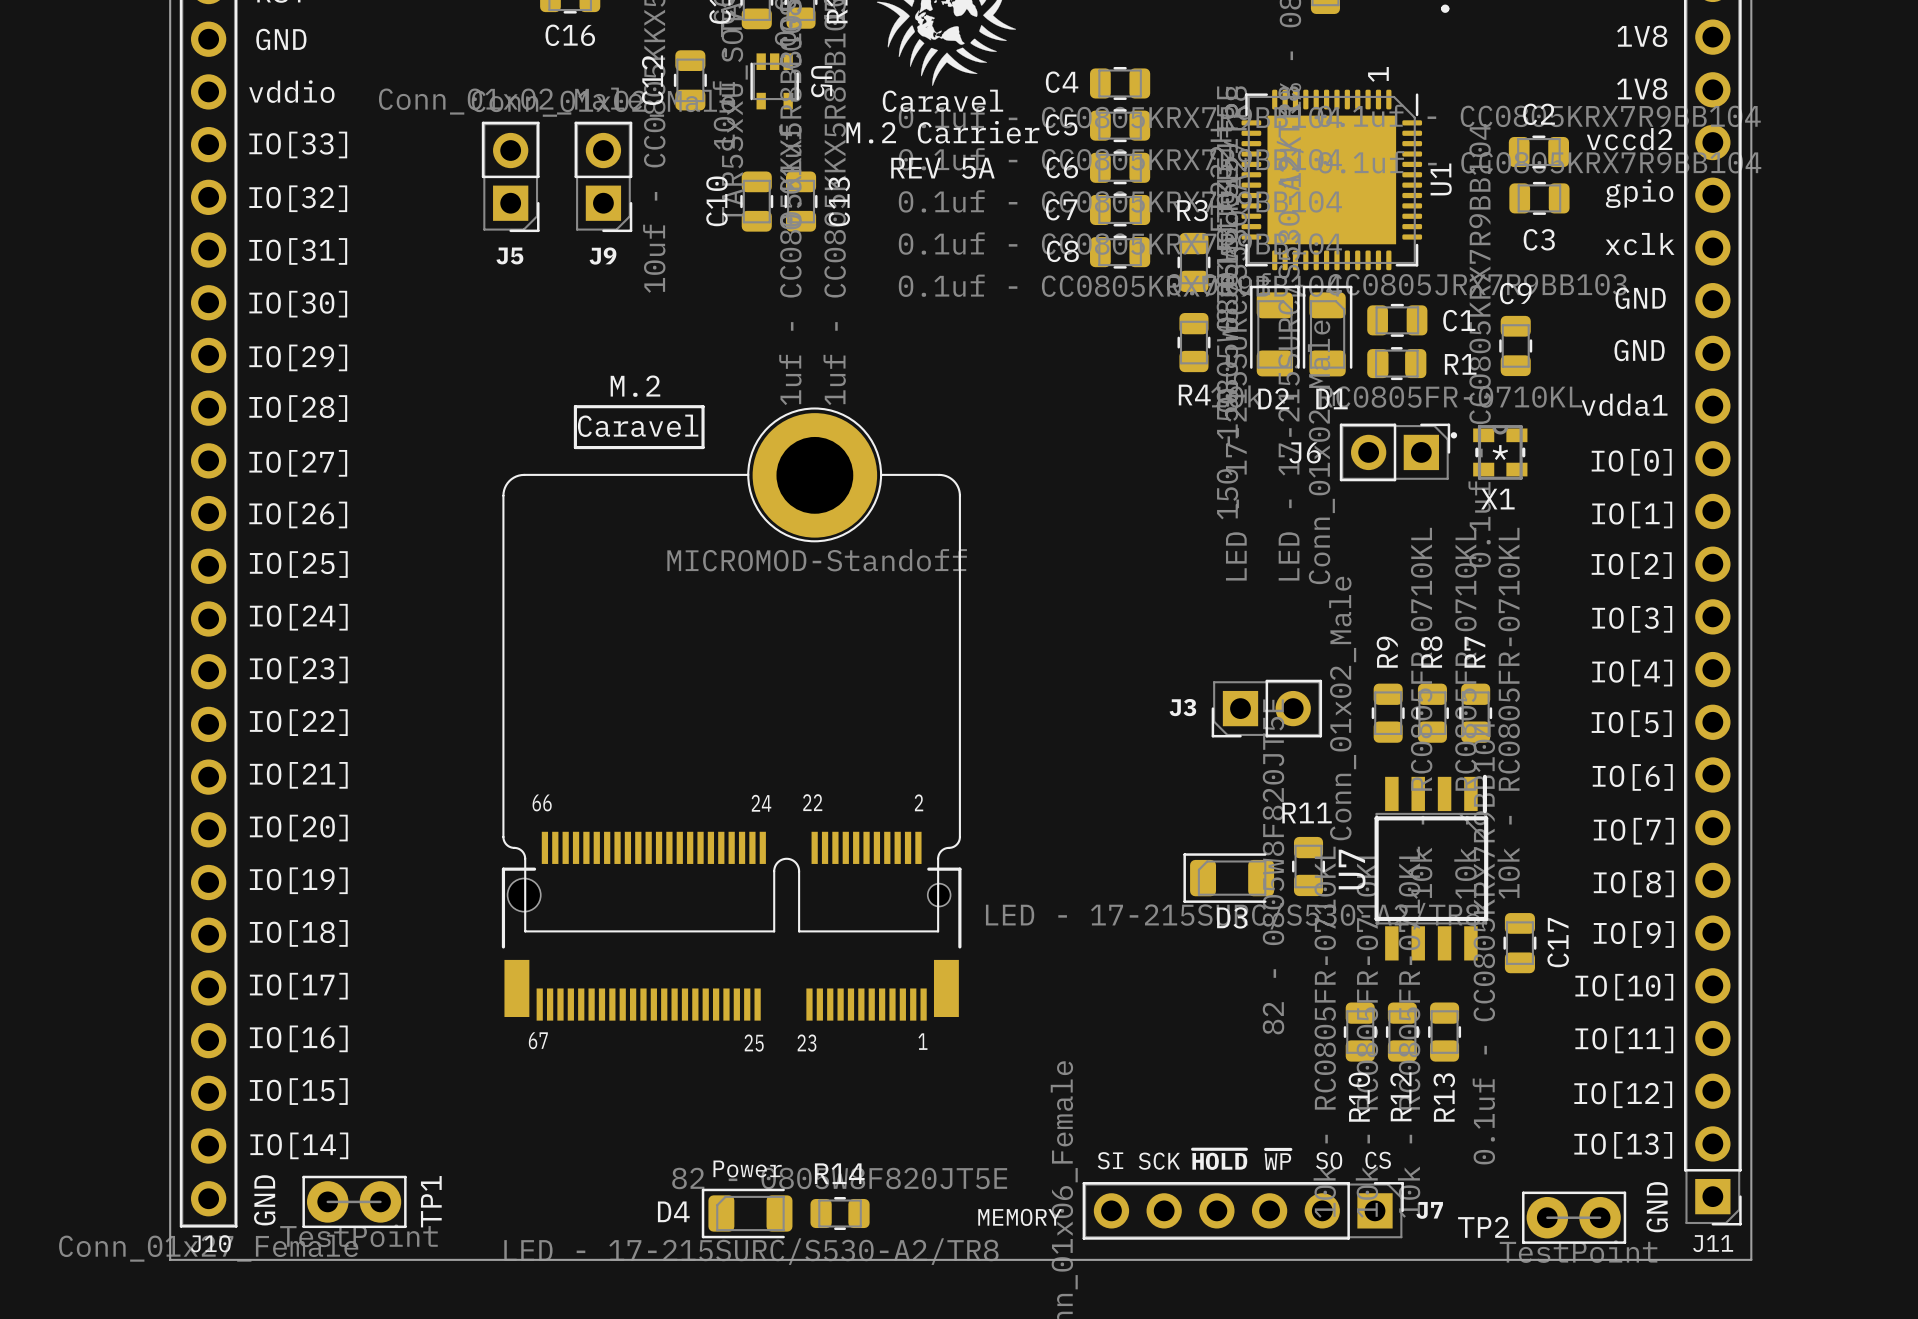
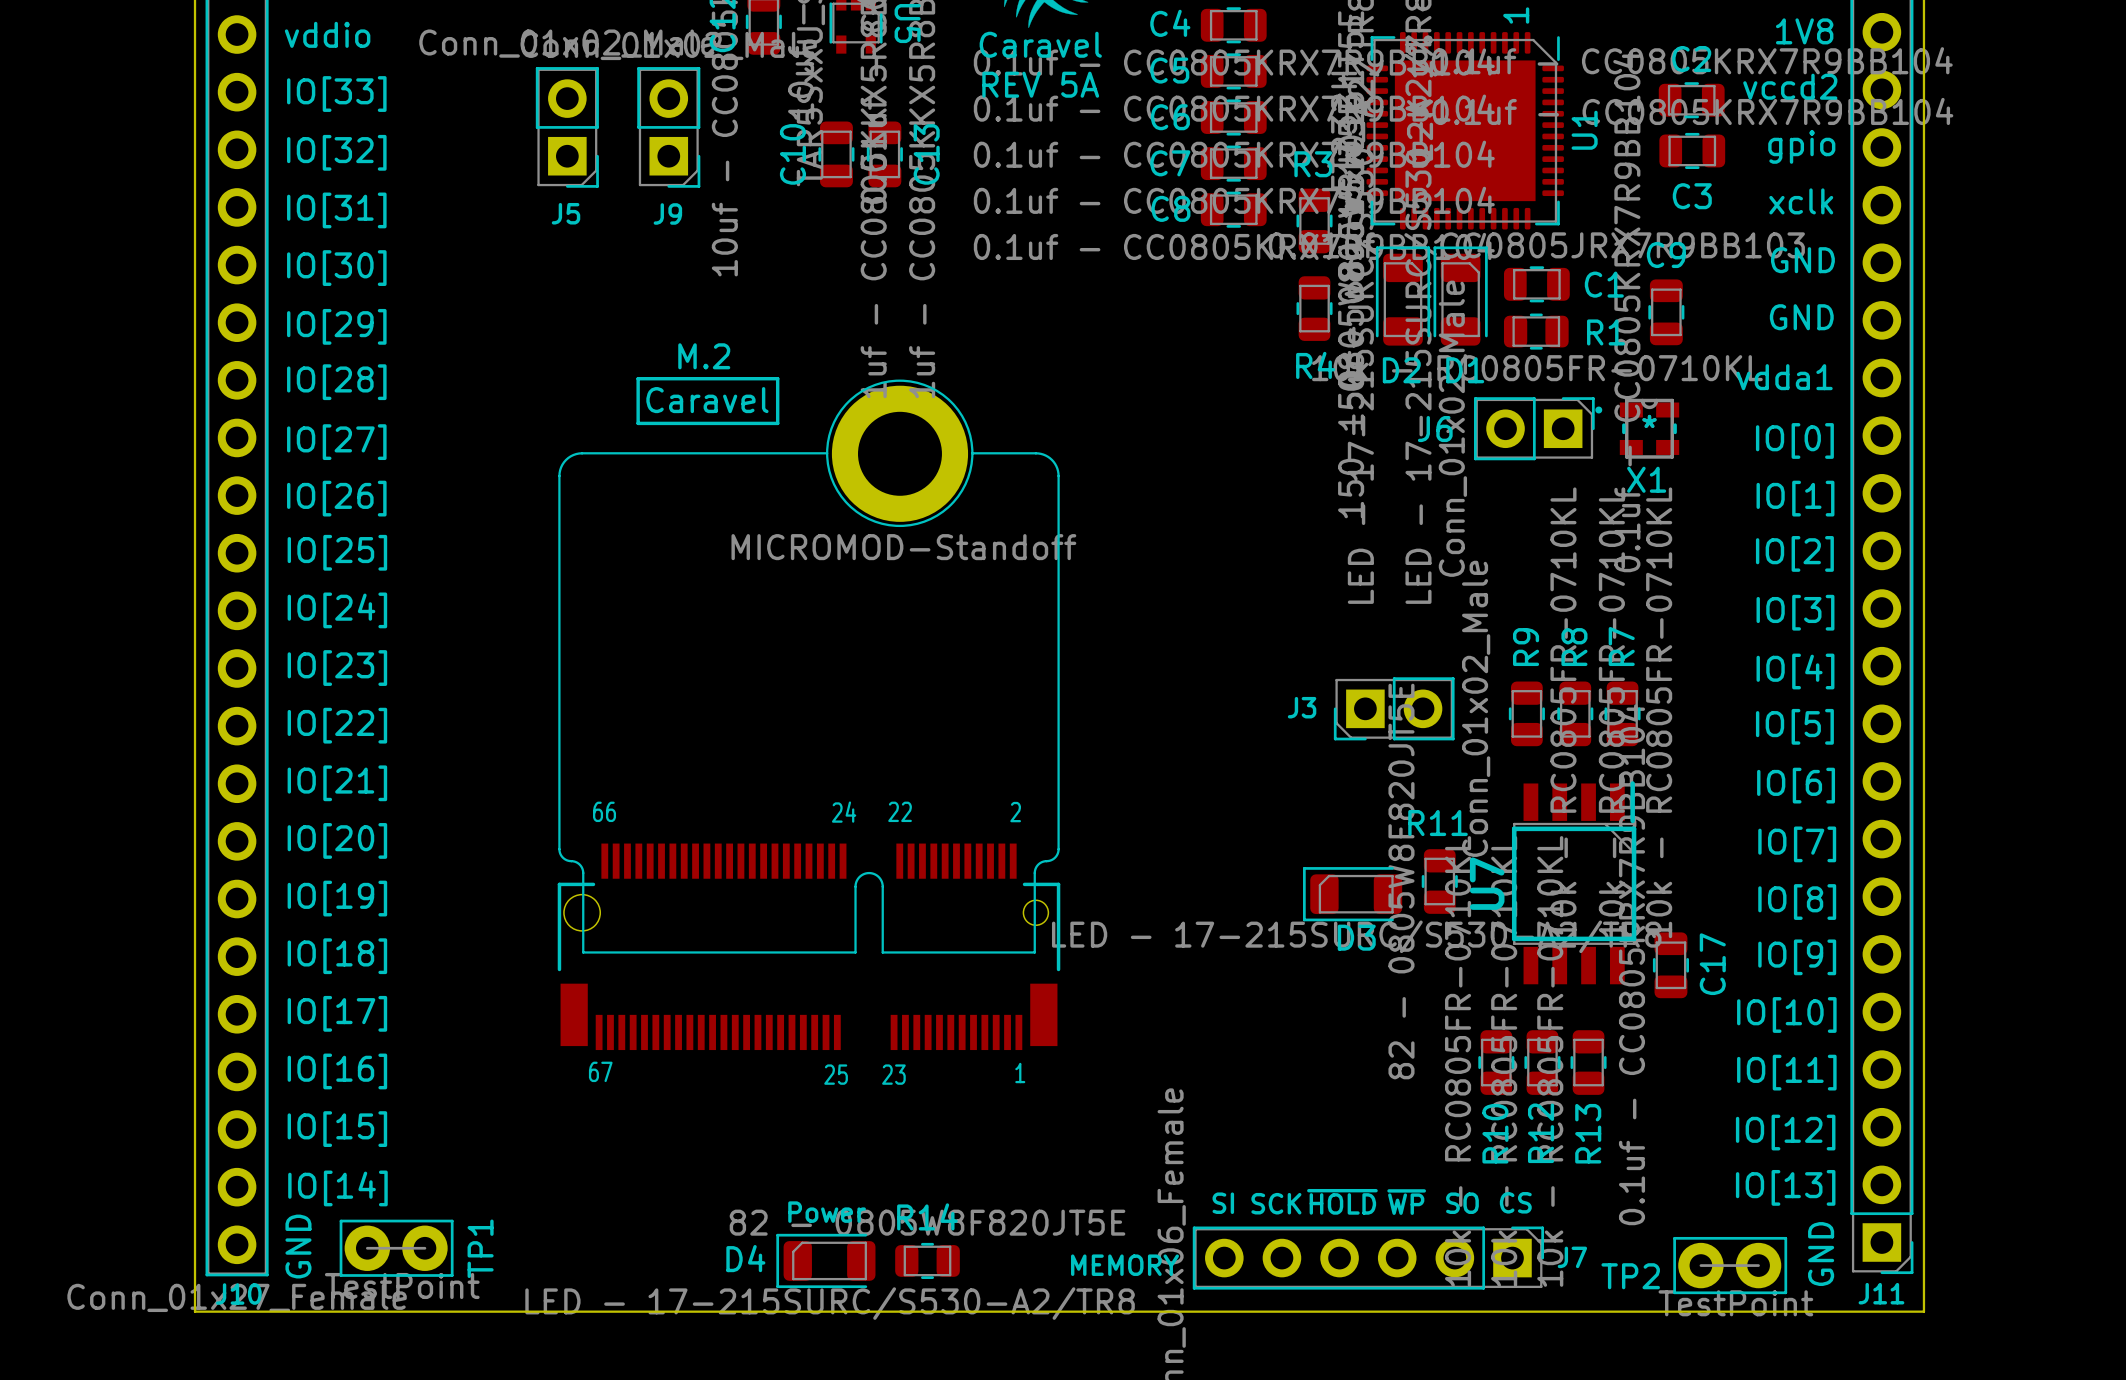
text: M.2 Carrier (942, 132) -> REV 5A (1040, 84)
text: REV 5A (942, 168) -> none

